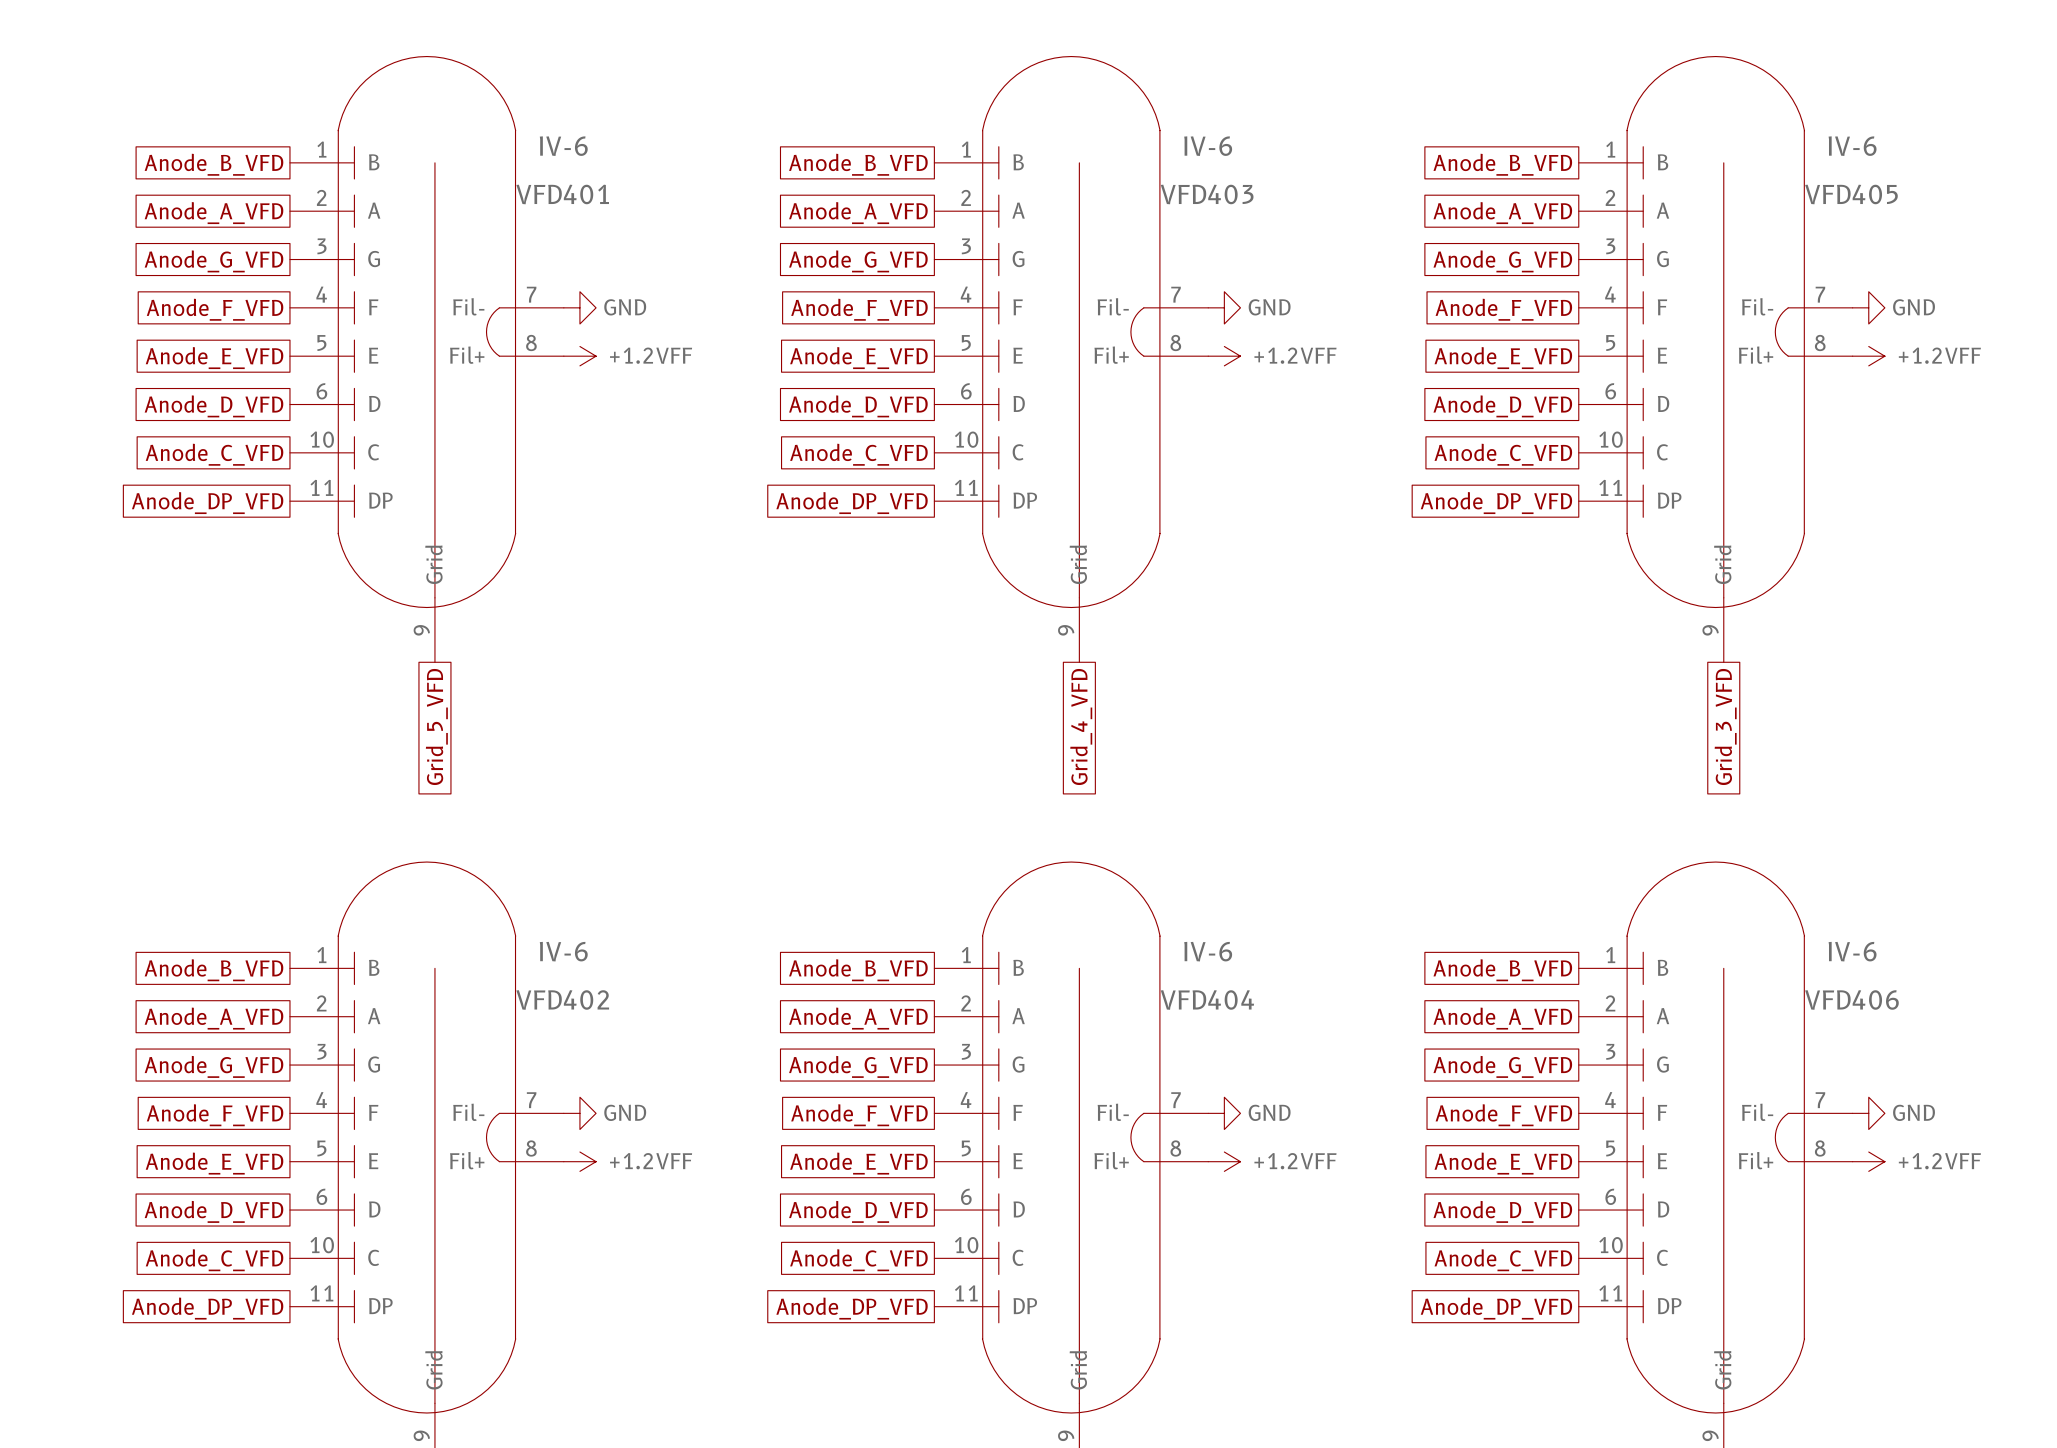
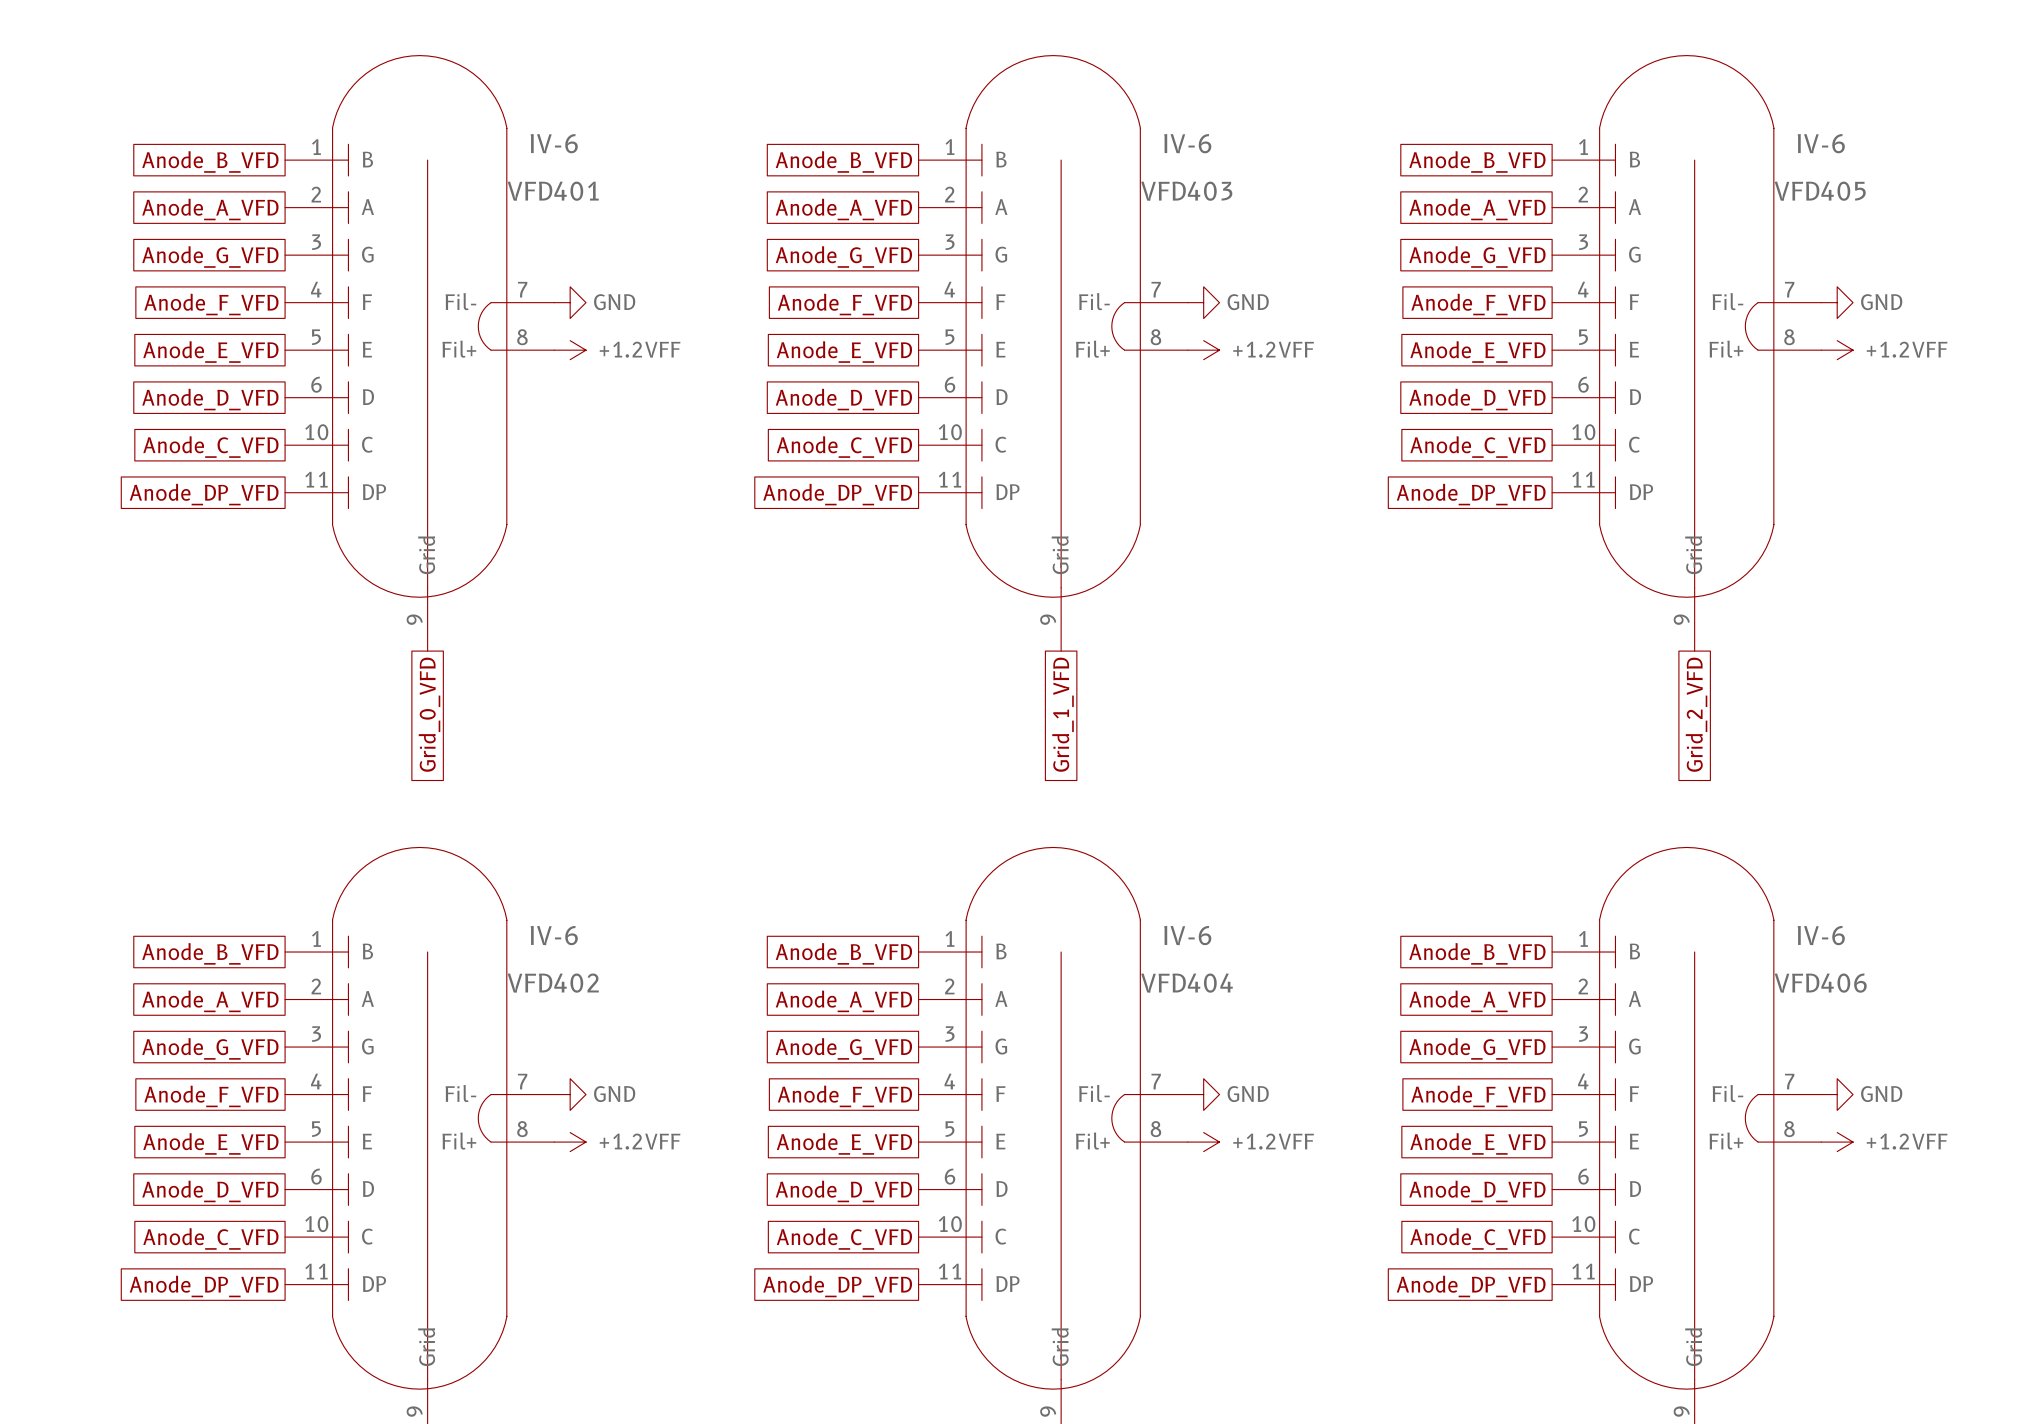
global label: Grid_5_VFD (436, 726) -> Grid_0_VFD (429, 714)
global label: Grid_4_VFD (1081, 726) -> Grid_1_VFD (1062, 714)
global label: Grid_3_VFD (1725, 726) -> Grid_2_VFD (1696, 714)

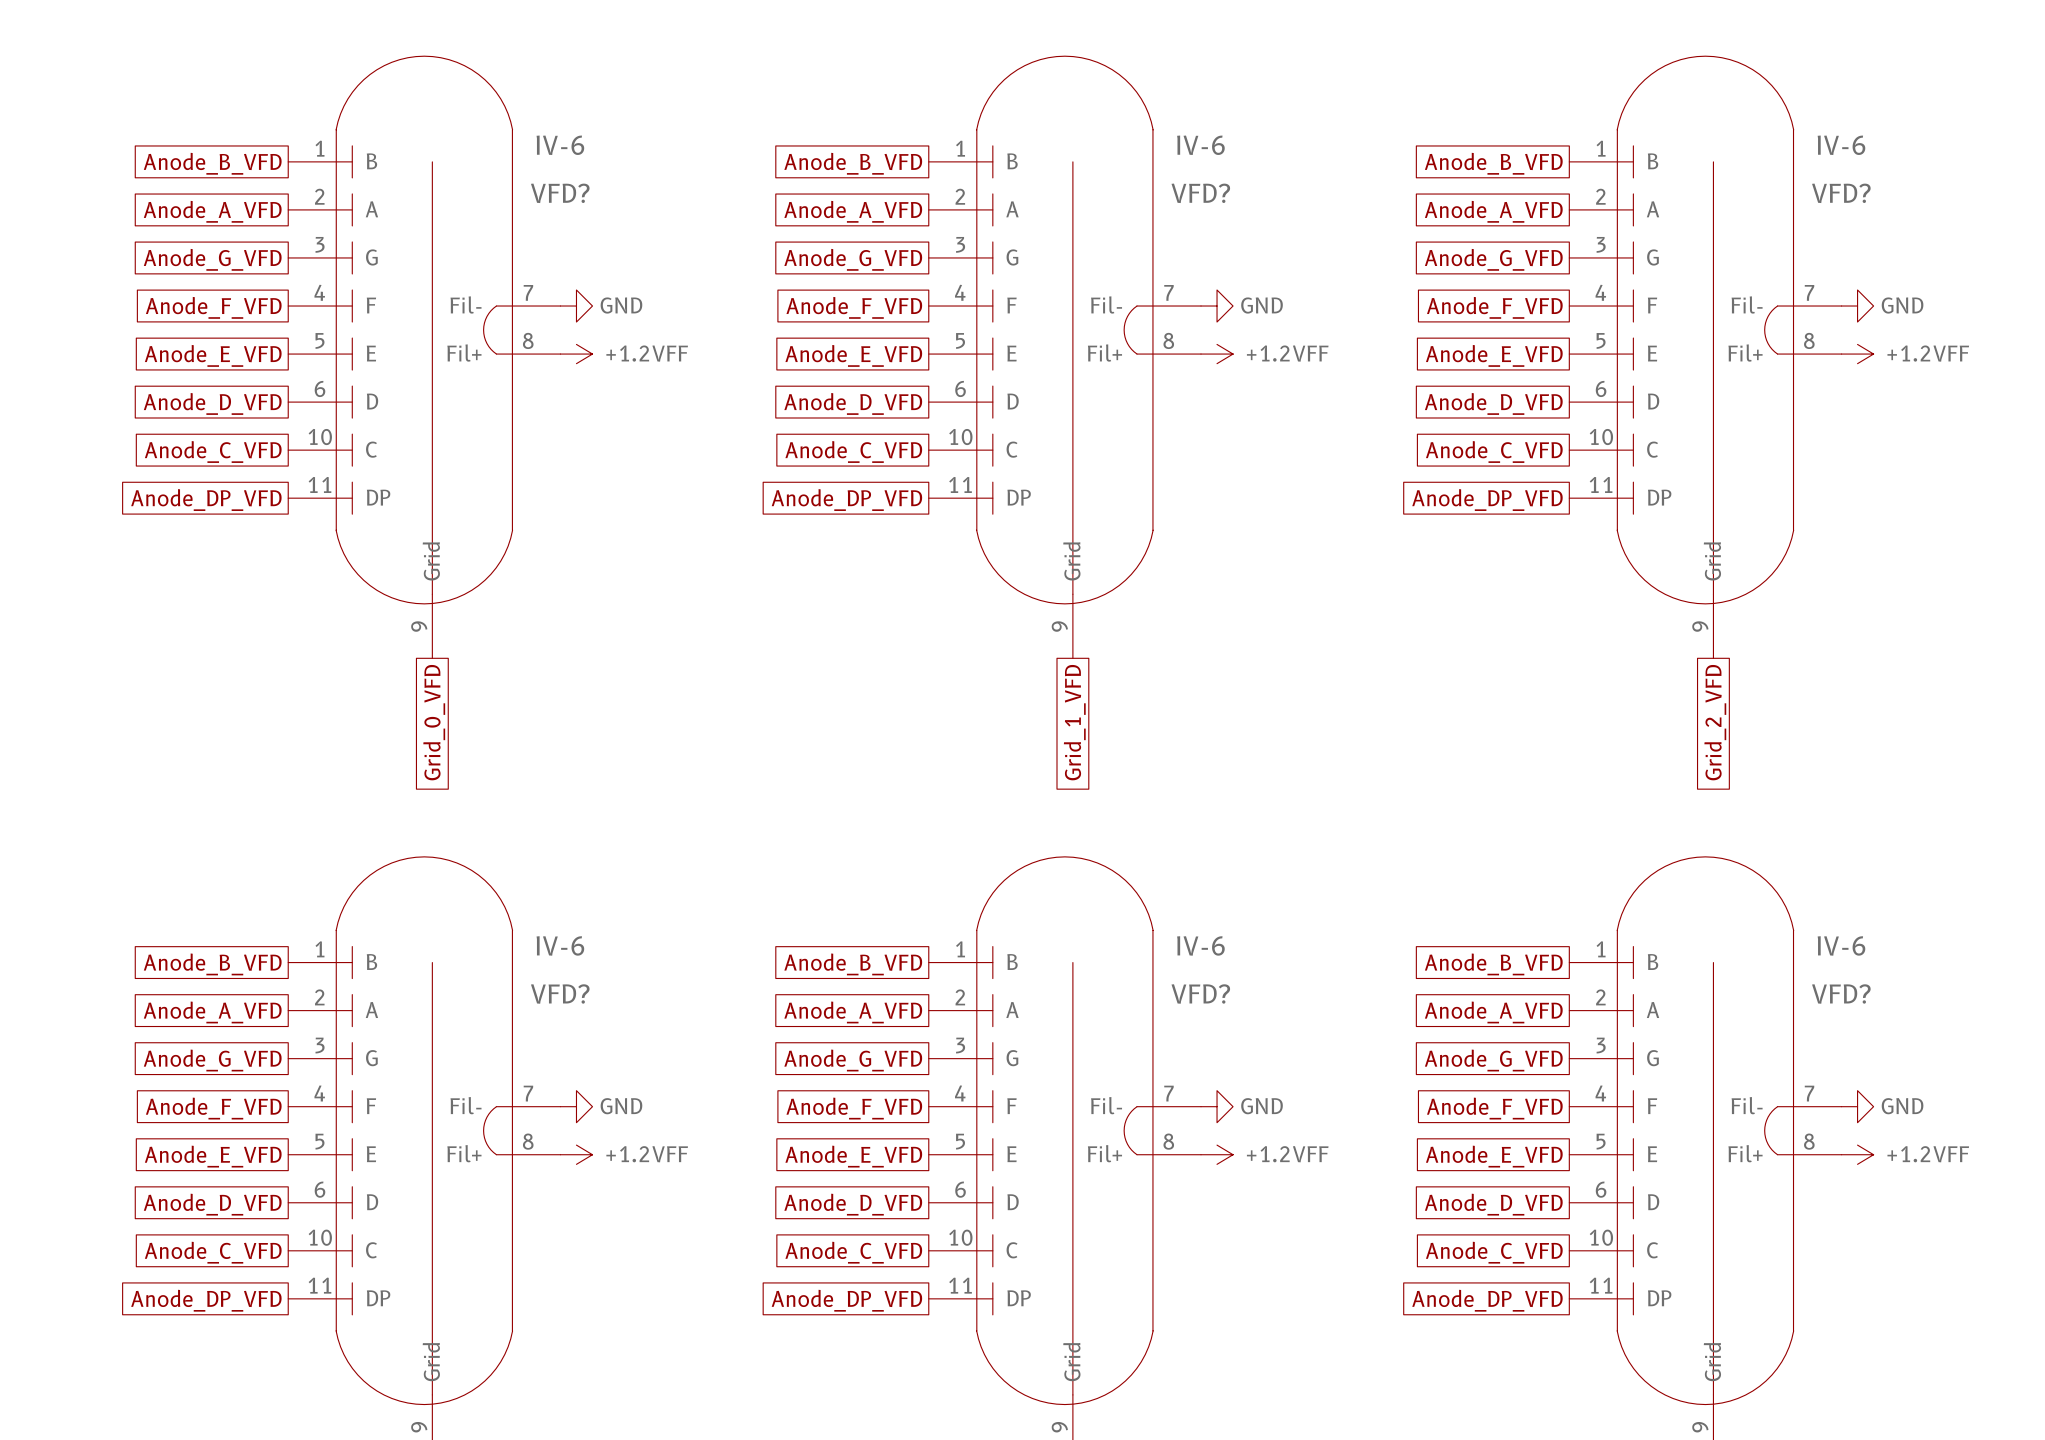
VFD401 name: VFD401 (553, 191) -> VFD? (560, 193)
VFD403 name: VFD403 (1186, 191) -> VFD? (1200, 193)
VFD405 name: VFD405 (1820, 191) -> VFD? (1841, 193)
VFD402 name: VFD402 (553, 983) -> VFD? (560, 994)
VFD404 name: VFD404 (1187, 983) -> VFD? (1200, 994)
VFD406 name: VFD406 (1820, 983) -> VFD? (1841, 994)

